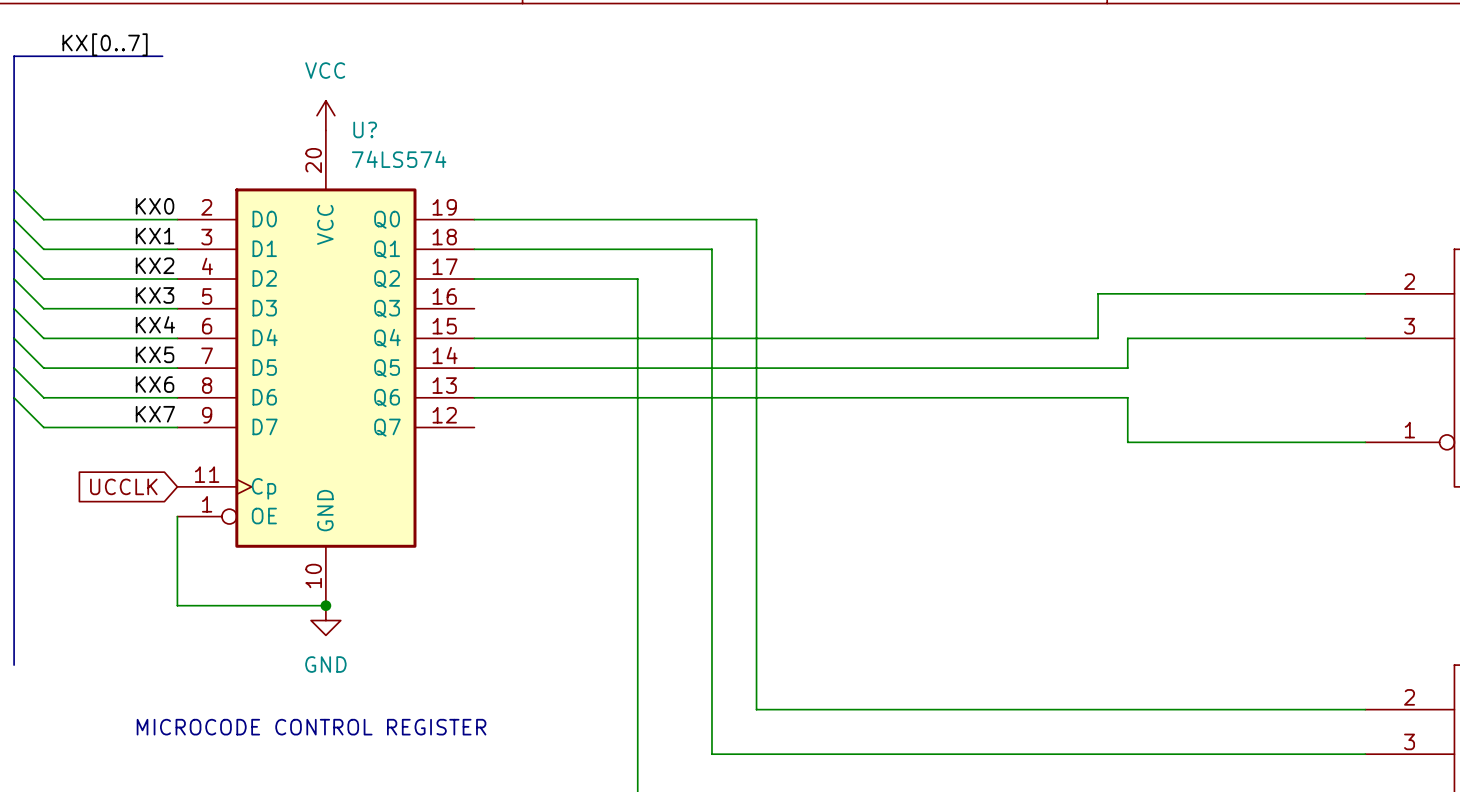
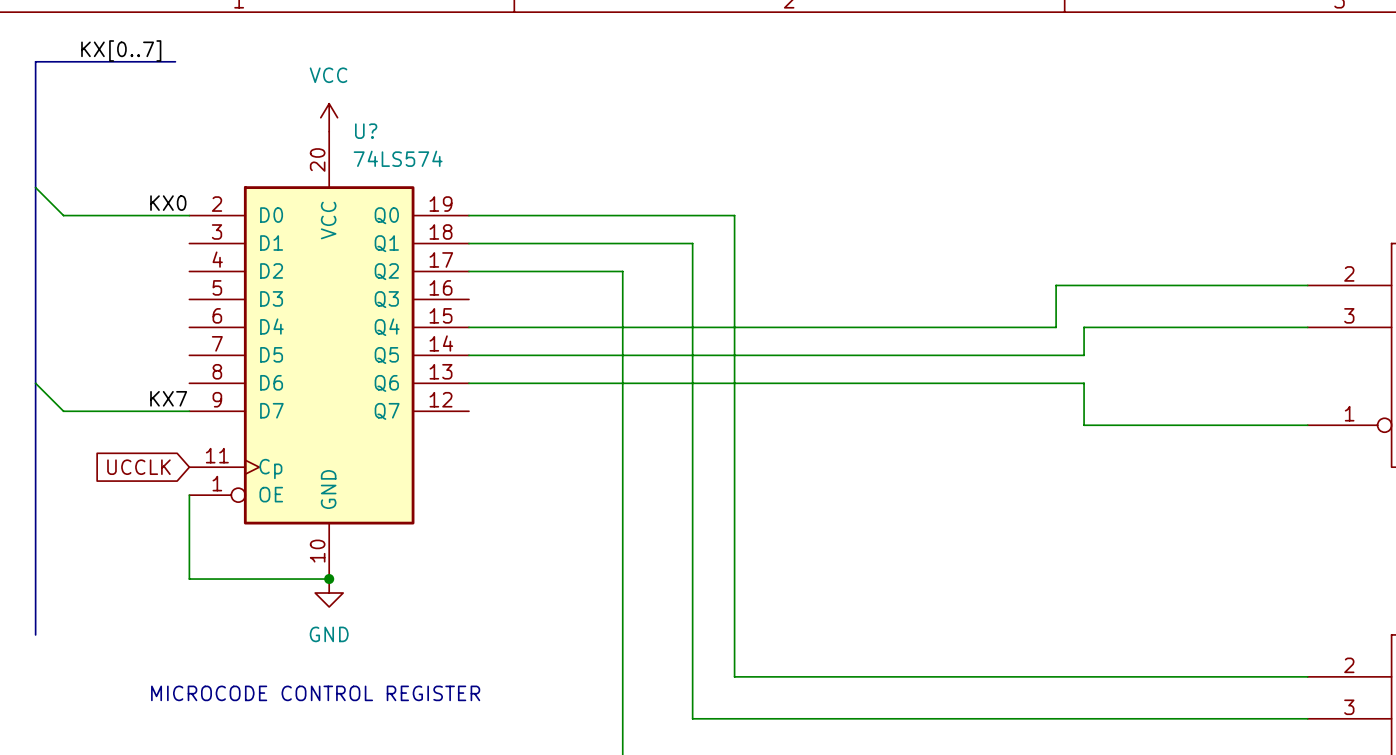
wire: (14, 219) (43, 249) (177, 249) -> none
label: KX1 (155, 236) -> none
wire: (14, 249) (43, 279) (177, 279) -> none
label: KX2 (155, 265) -> none
wire: (14, 279) (43, 308) (177, 308) -> none
label: KX3 (155, 295) -> none
wire: (14, 308) (43, 338) (177, 338) -> none
label: KX4 (155, 324) -> none
wire: (14, 338) (43, 368) (177, 368) -> none
label: KX5 (155, 354) -> none
wire: (14, 368) (43, 397) (177, 397) -> none
label: KX6 (155, 384) -> none

